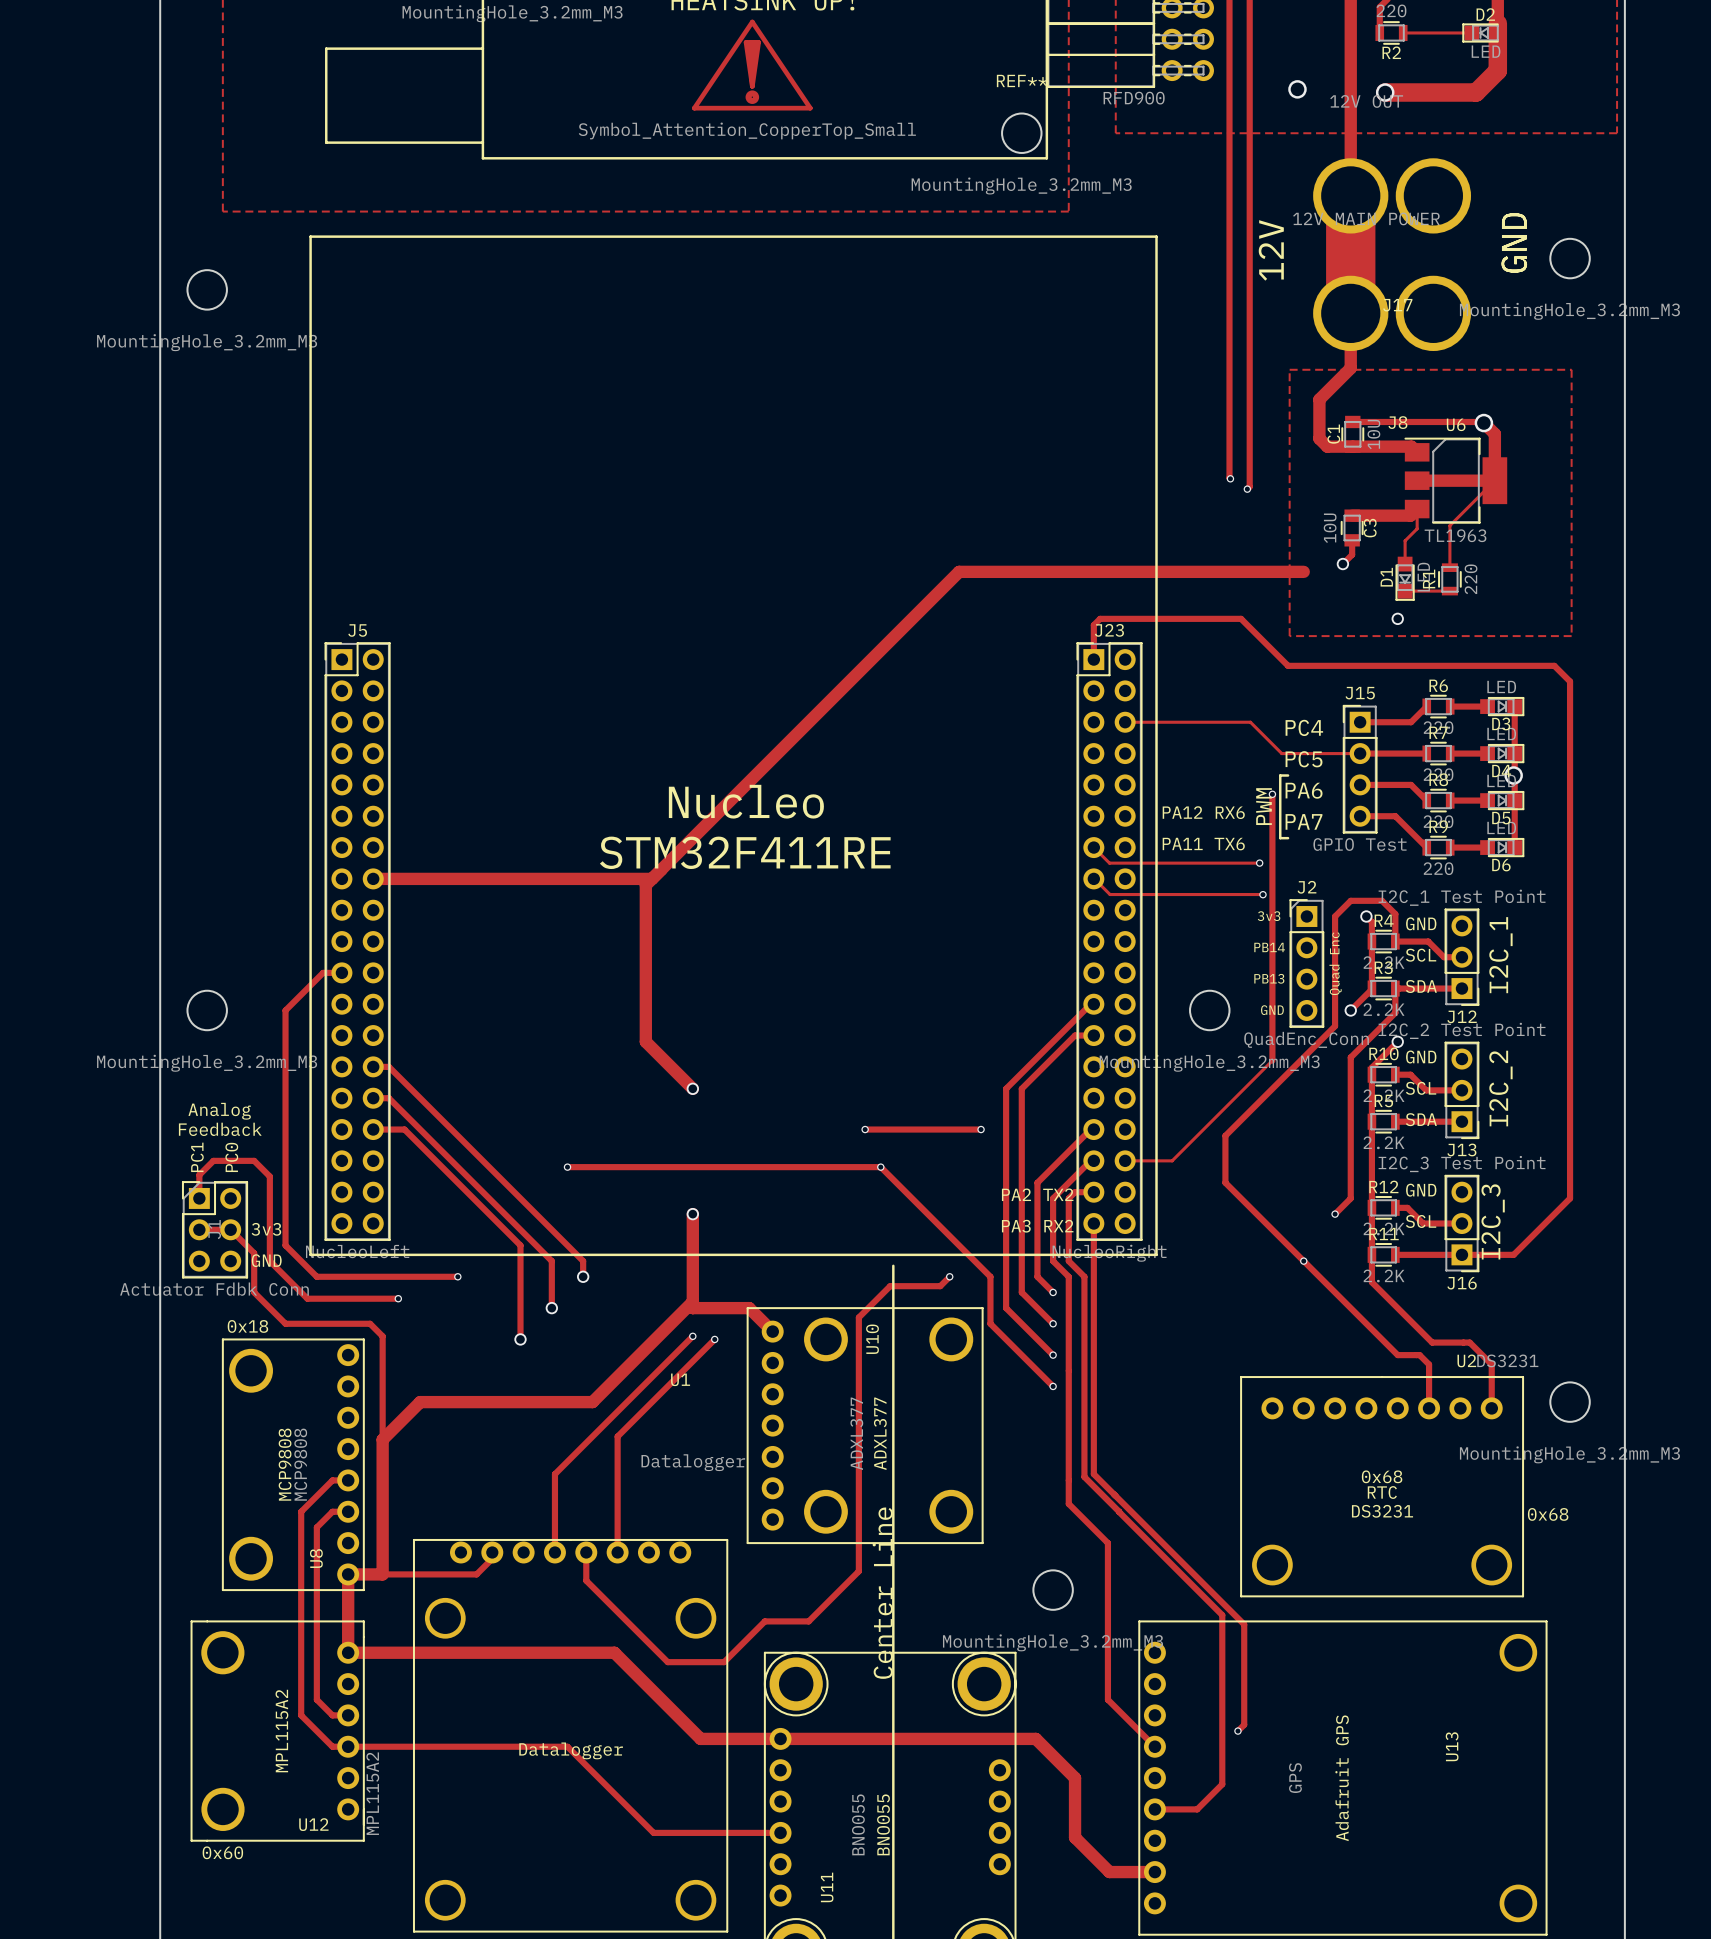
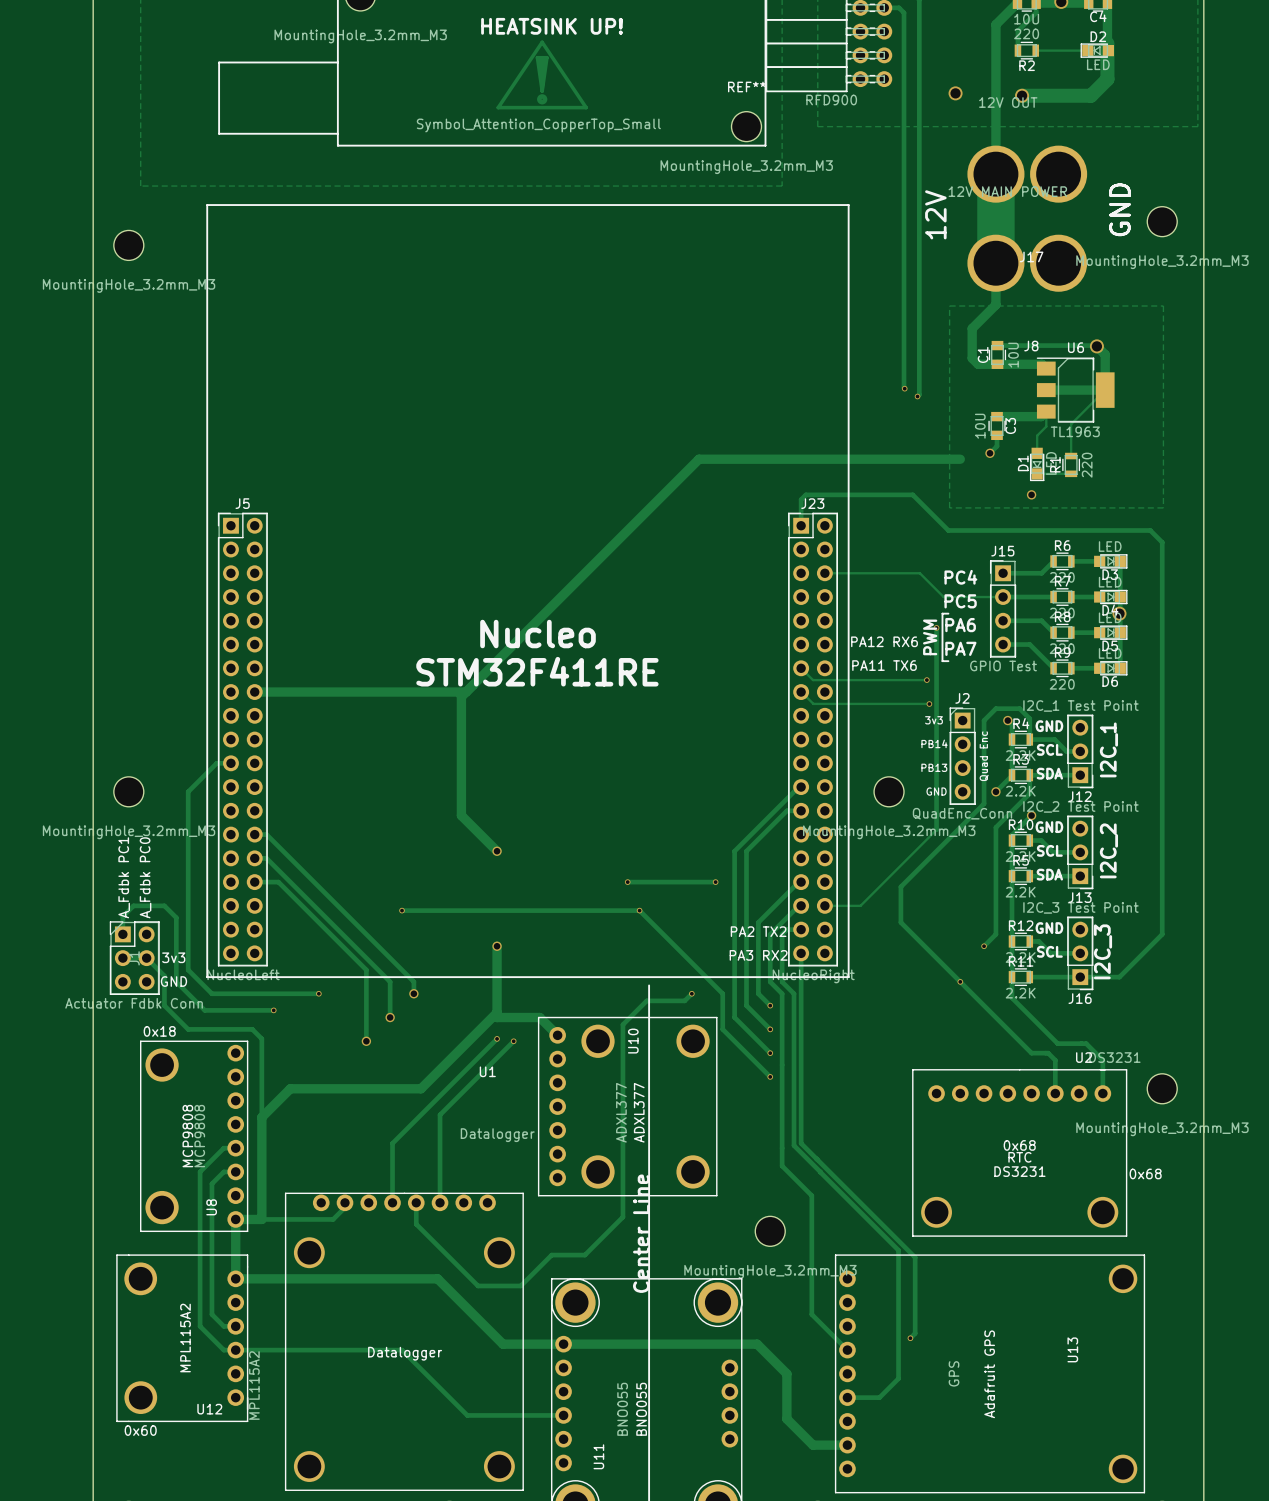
text: Analog (219, 1111) -> none
text: none -> A_Fdbk PC1 (124, 877)
text: none -> A_Fdbk PC0 (145, 877)
text: Feedback (220, 1129) -> none
text: PC1 (197, 1157) -> none
text: PC0 (231, 1157) -> none

